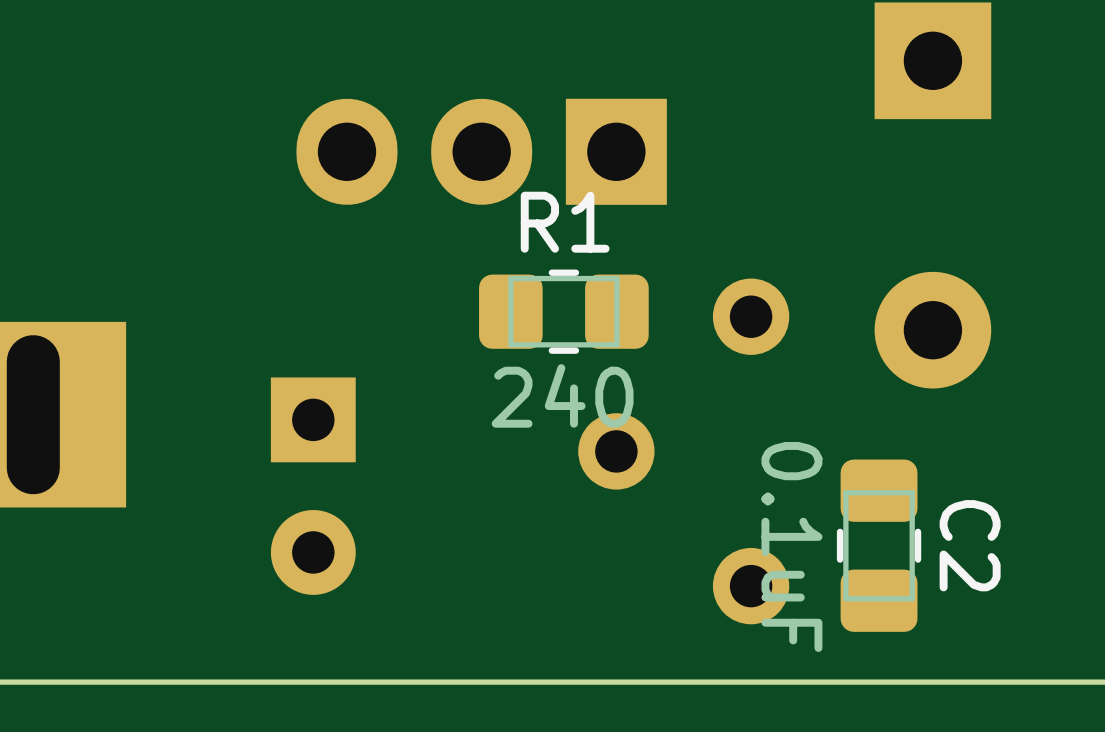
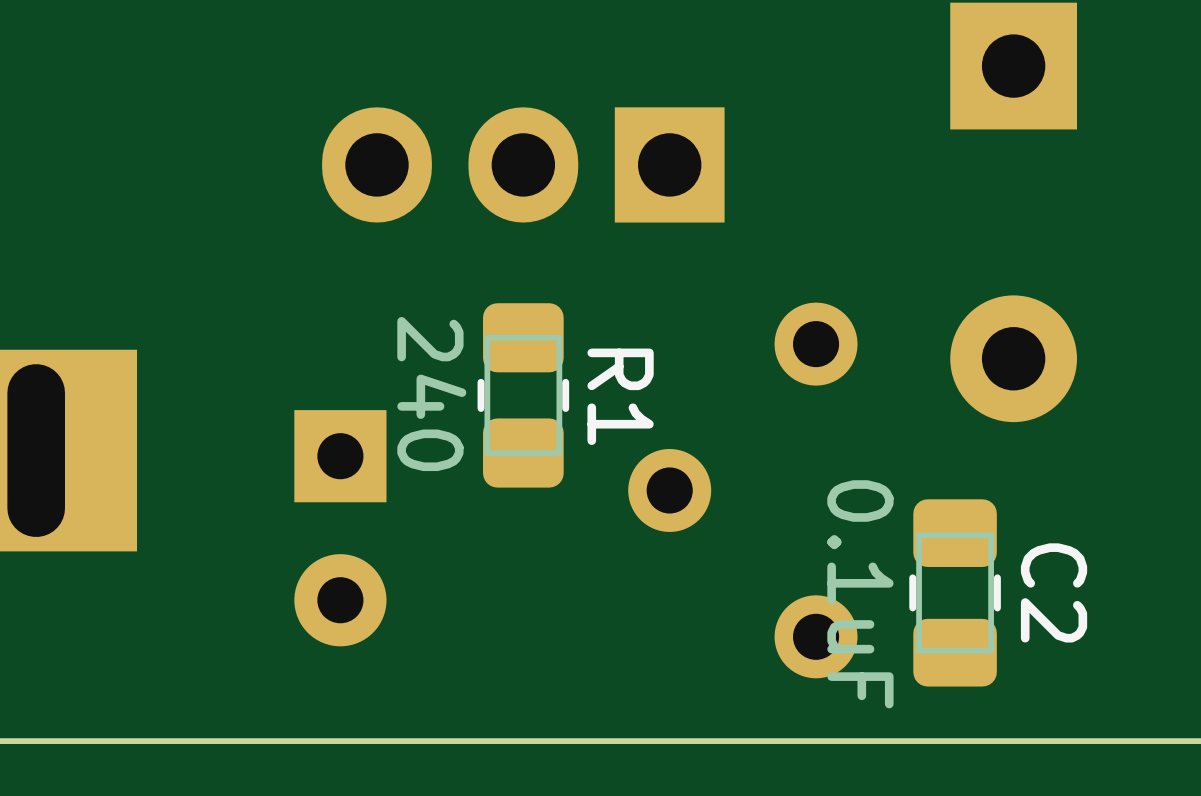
R1 rotation: 0° (563, 311) -> 90° clockwise (523, 395)

